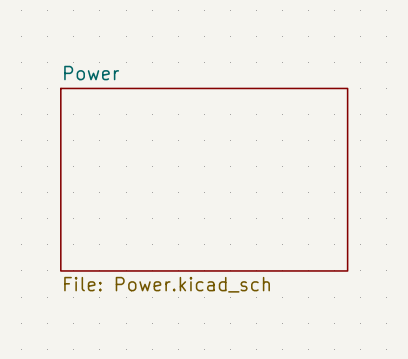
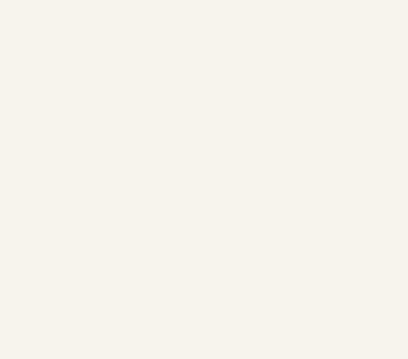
sheet Power: File: Power.kicad_sch (204, 179) -> none

